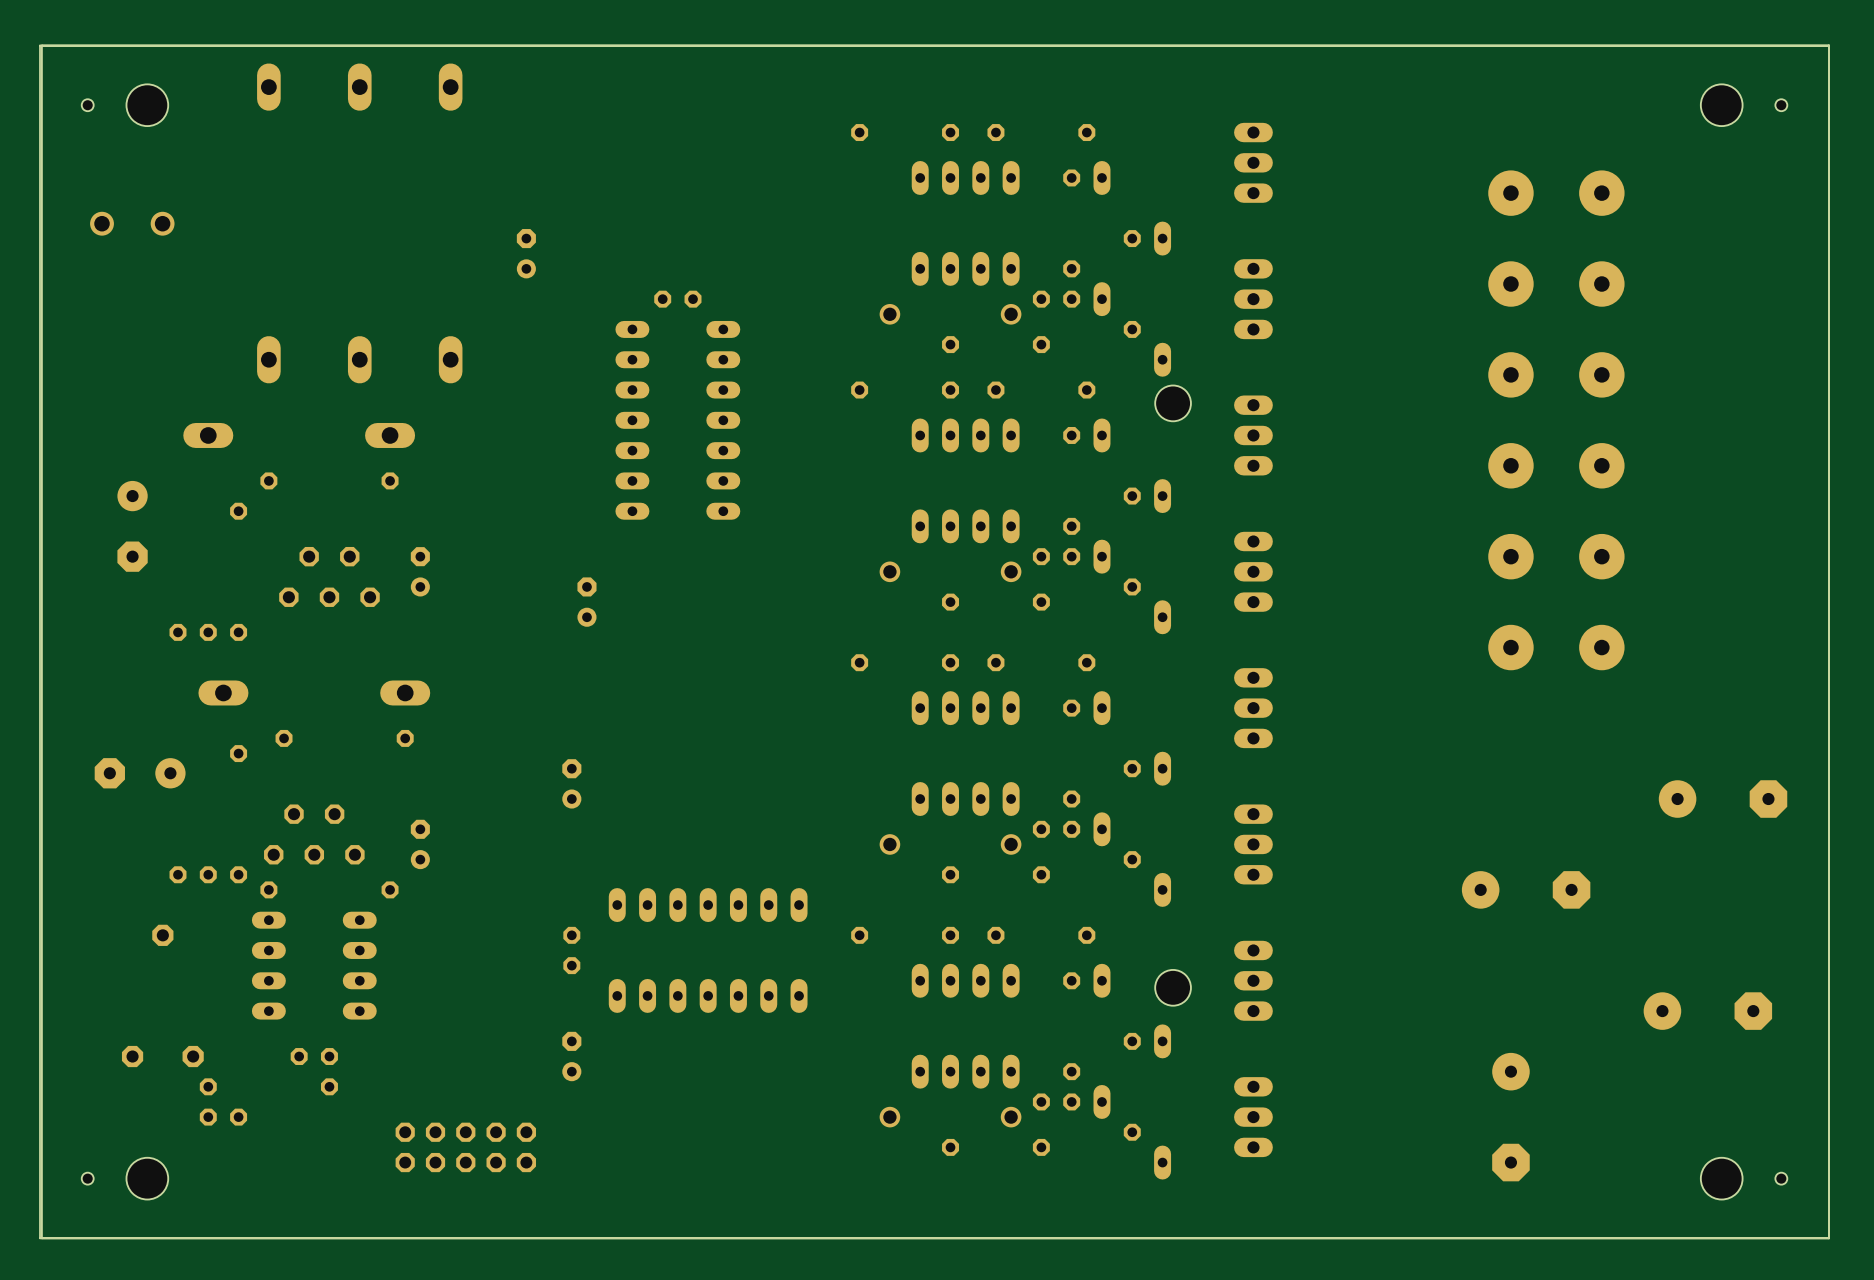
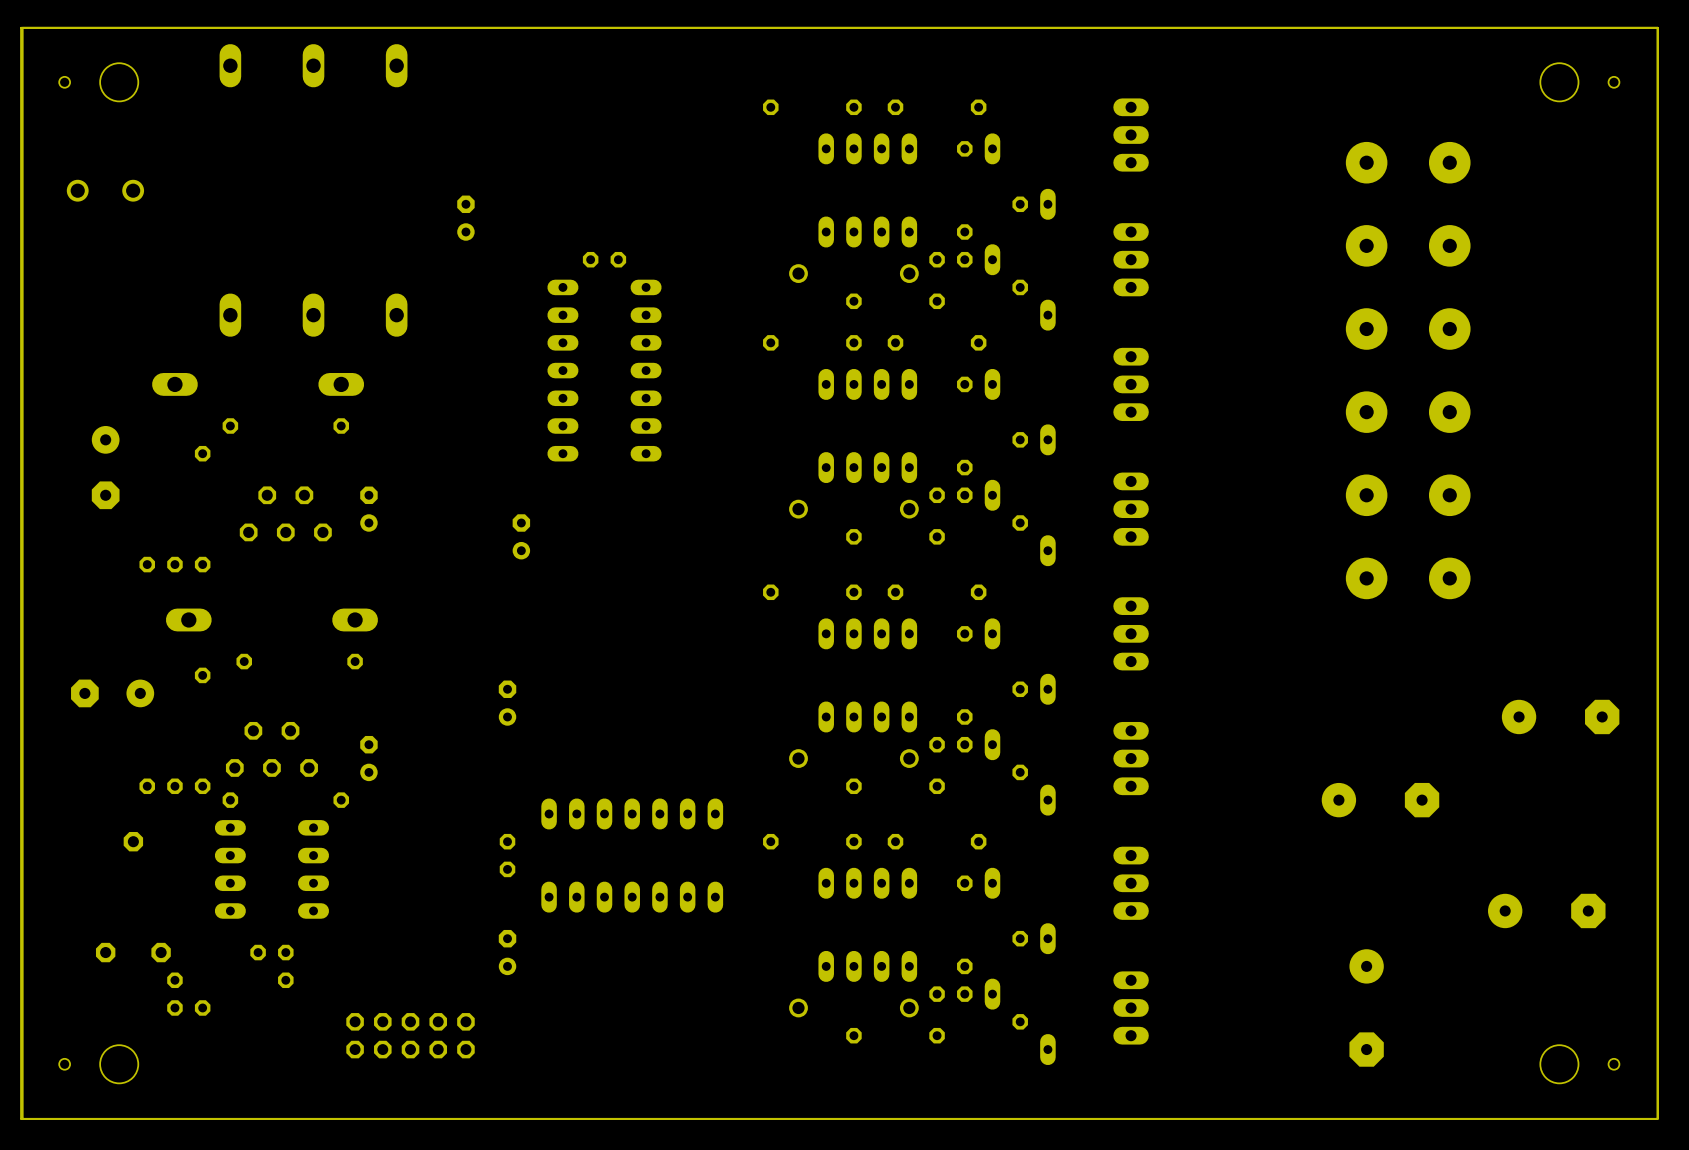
hole: (1173, 403) -> none
hole: (1173, 987) -> none

